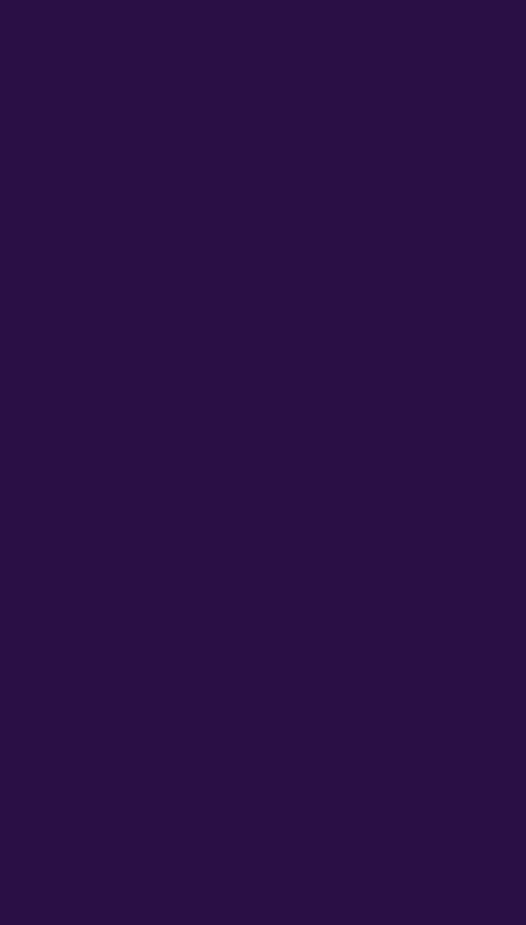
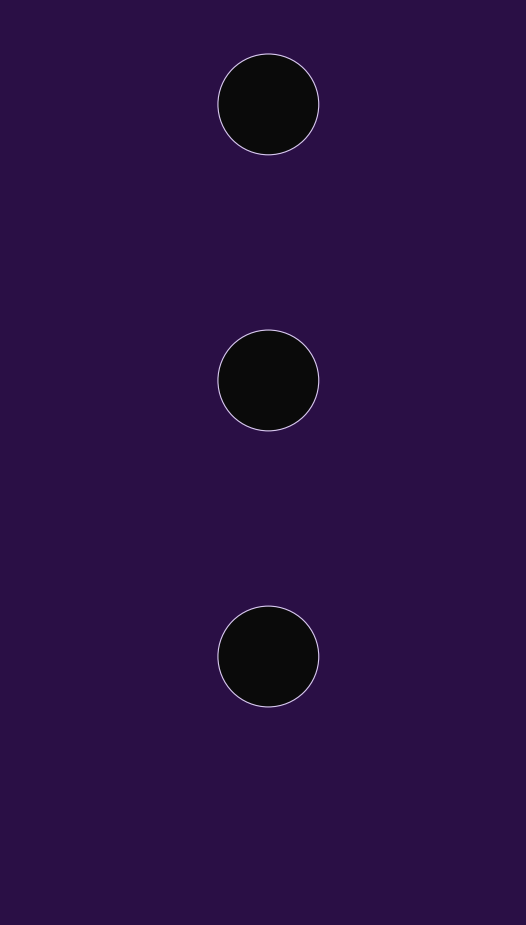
part: none -> (268, 104)
part: none -> (268, 380)
part: none -> (268, 656)

